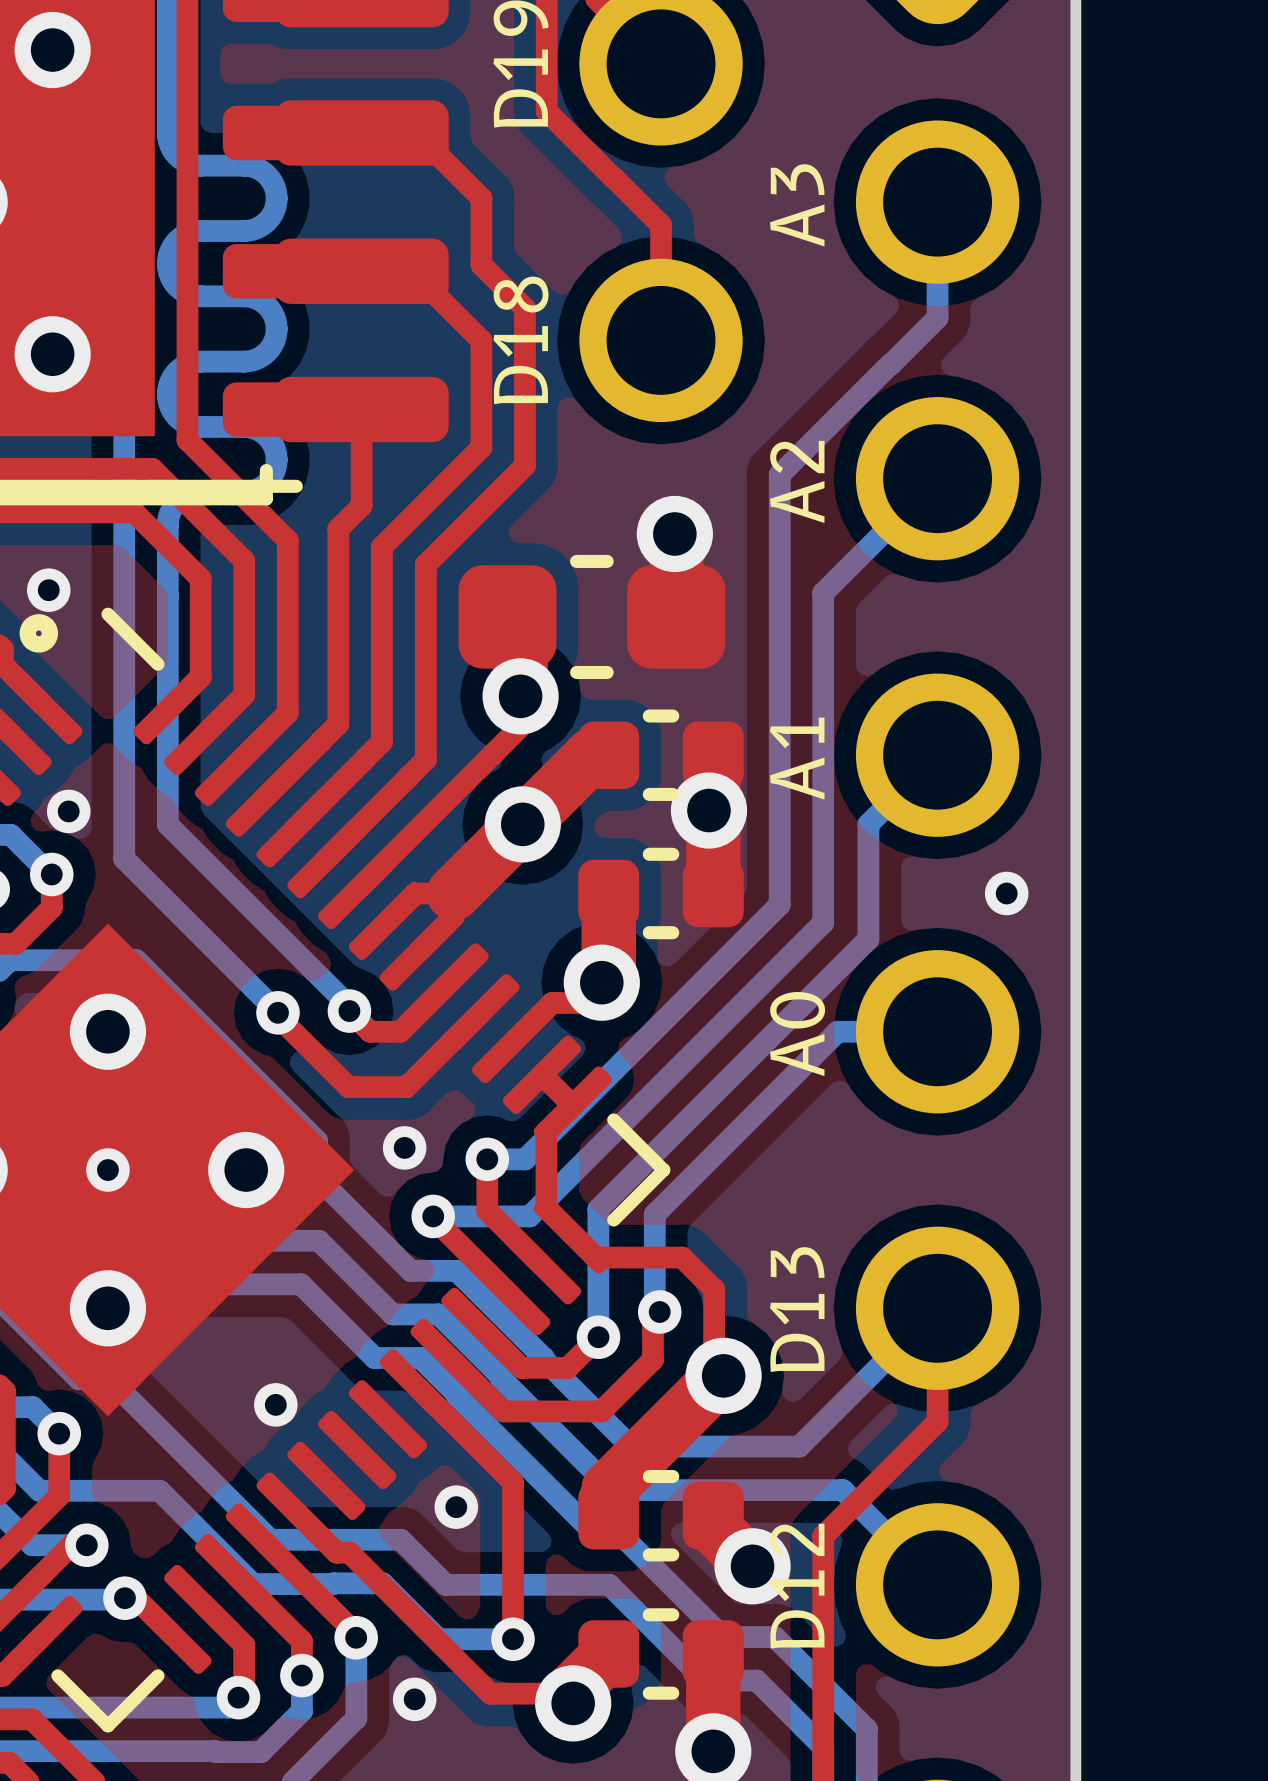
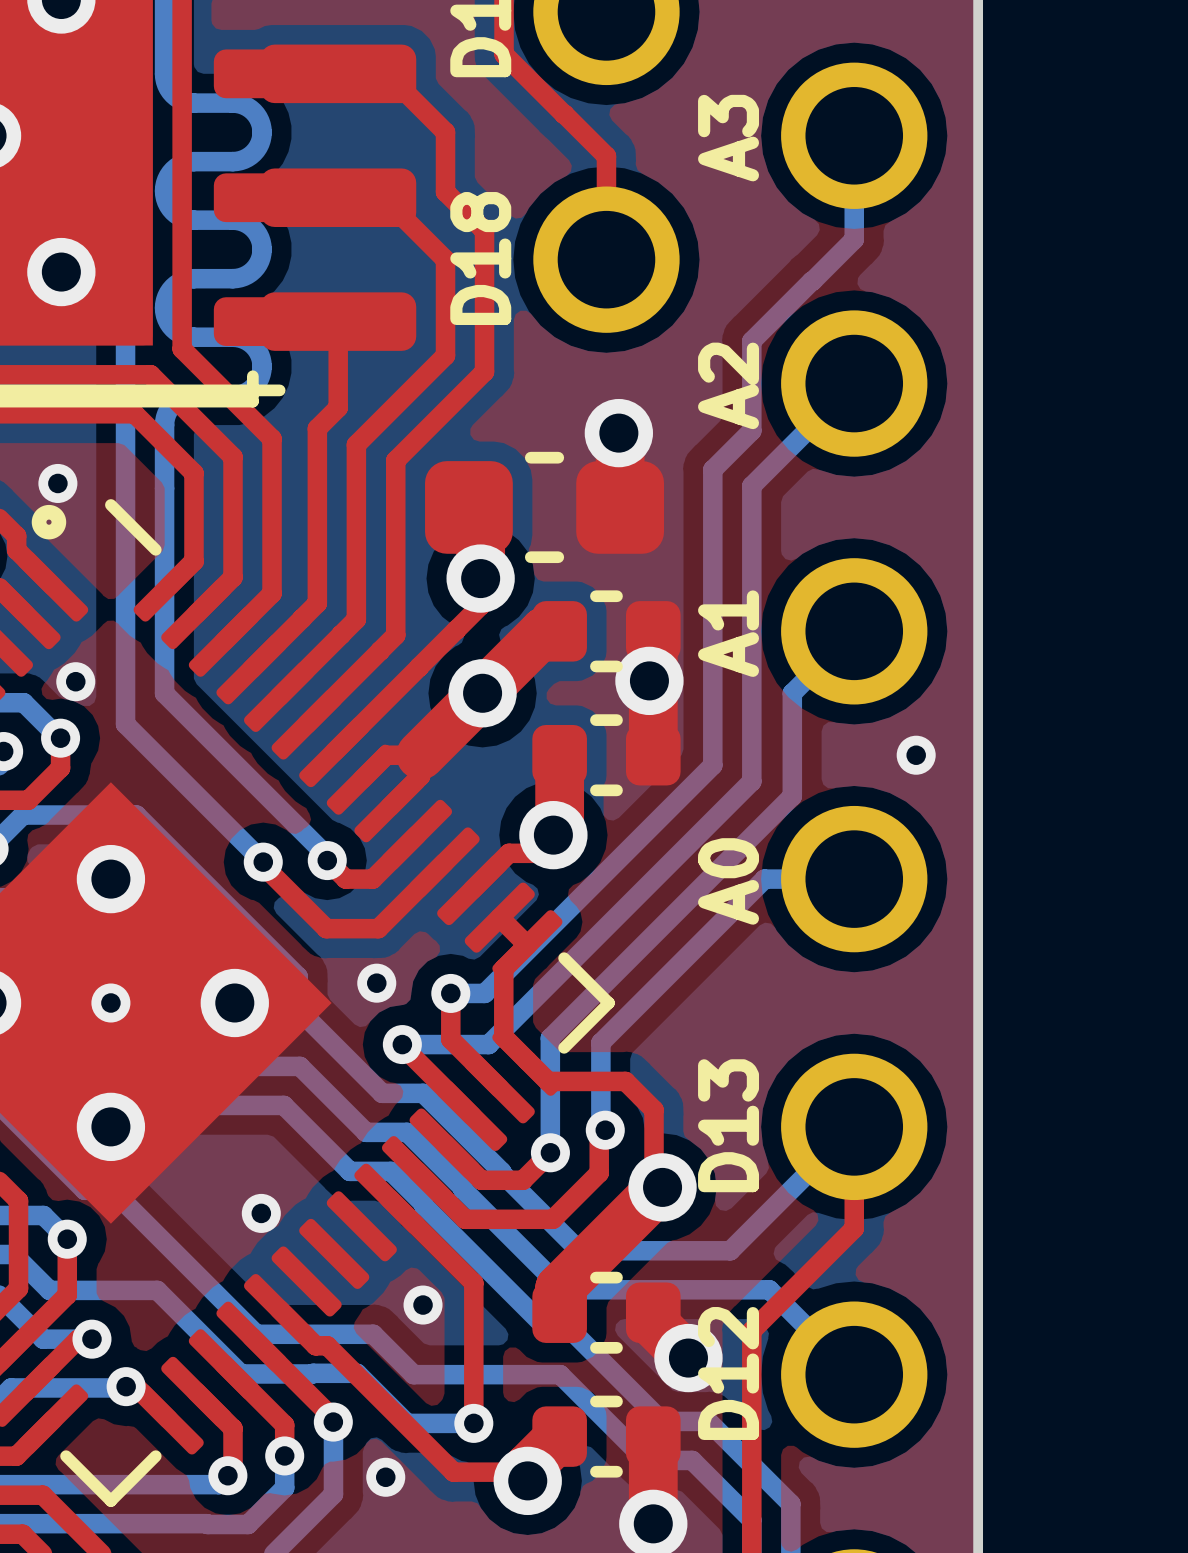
bottom track: (823, 431) (779, 474) (779, 574) -> (751, 341) (751, 430) (712, 469)

